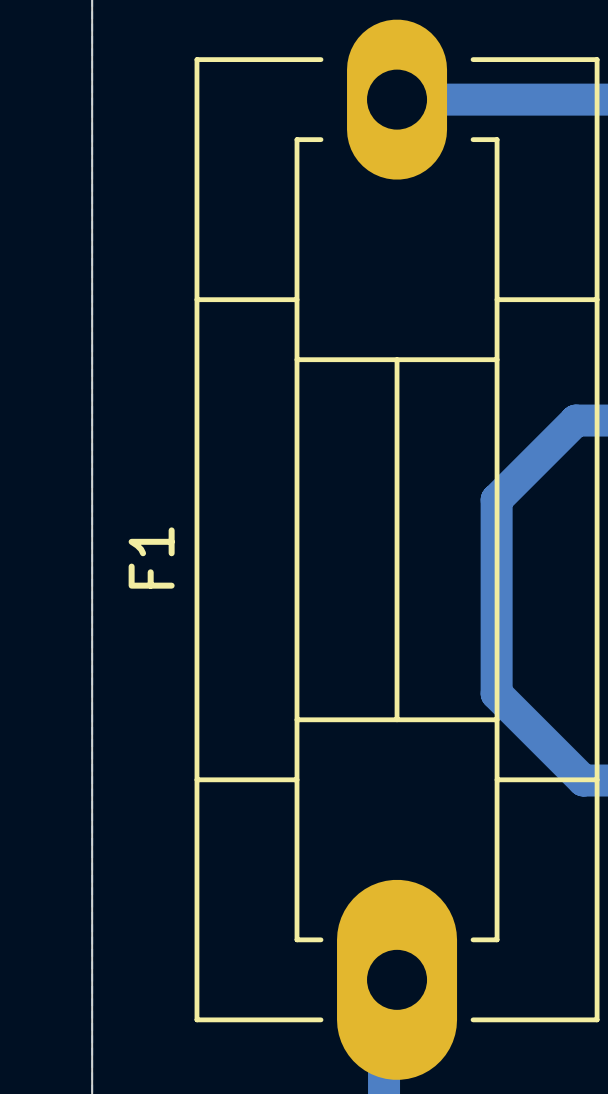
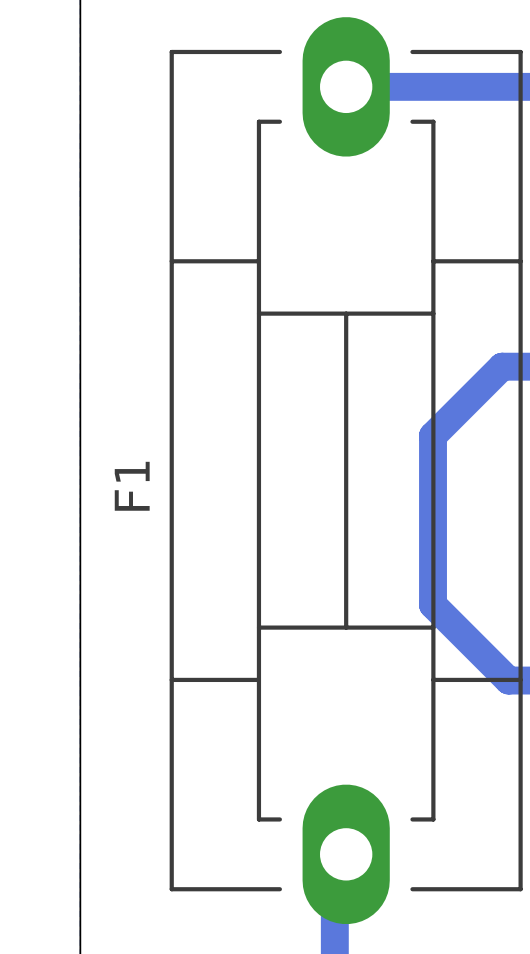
F1 footprint: [194, 19, 600, 1080] -> [169, 17, 523, 925]

